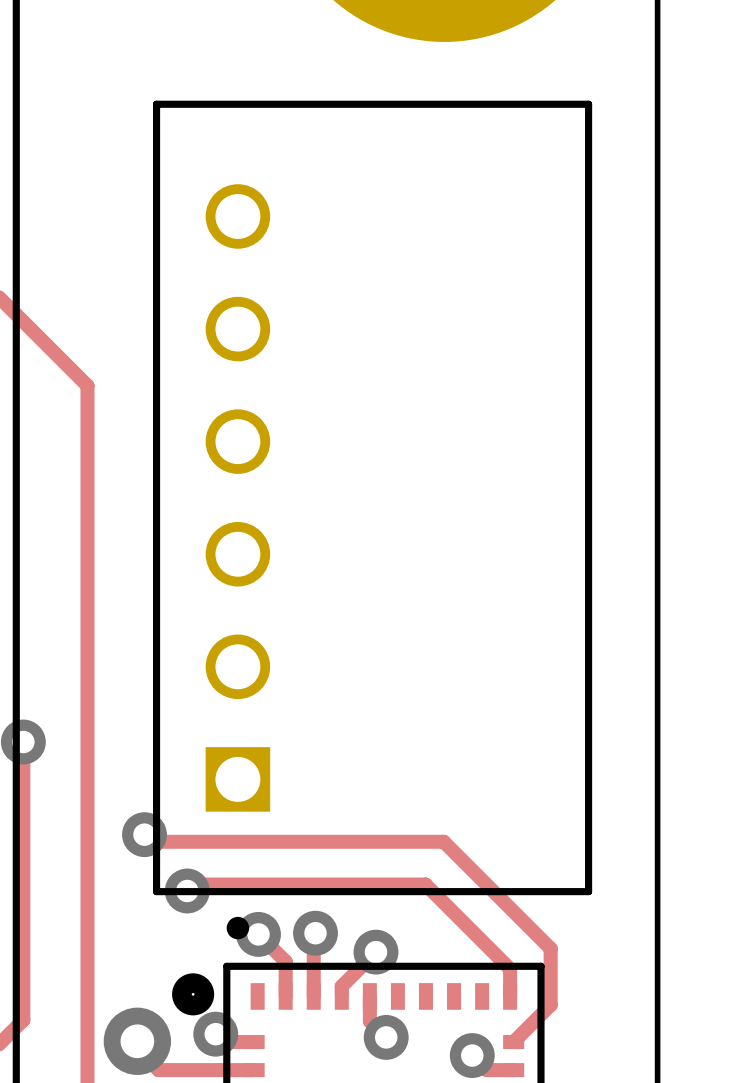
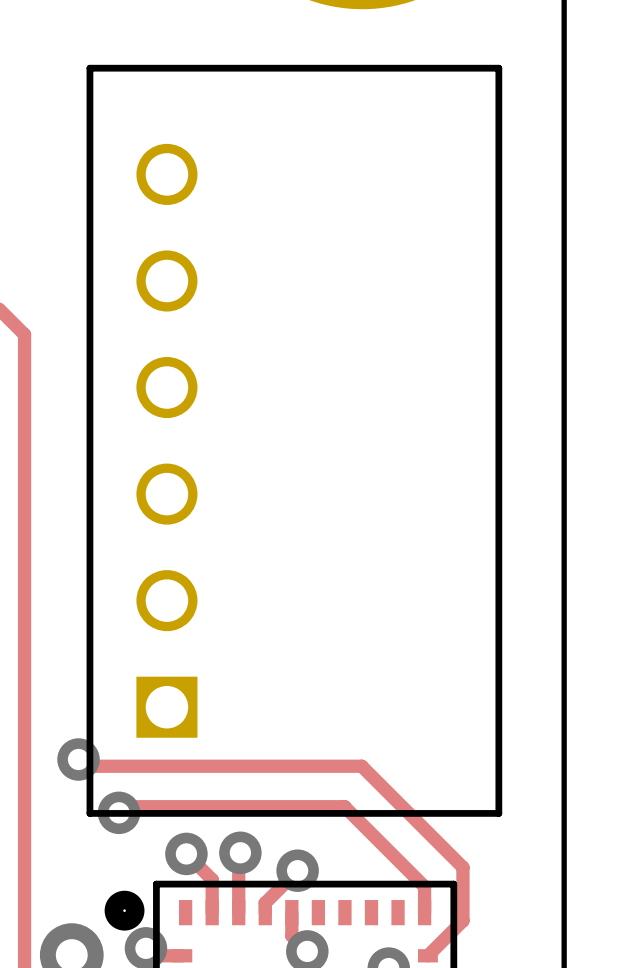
part footprint: [152, 100, 593, 940] -> [86, 64, 503, 817]

